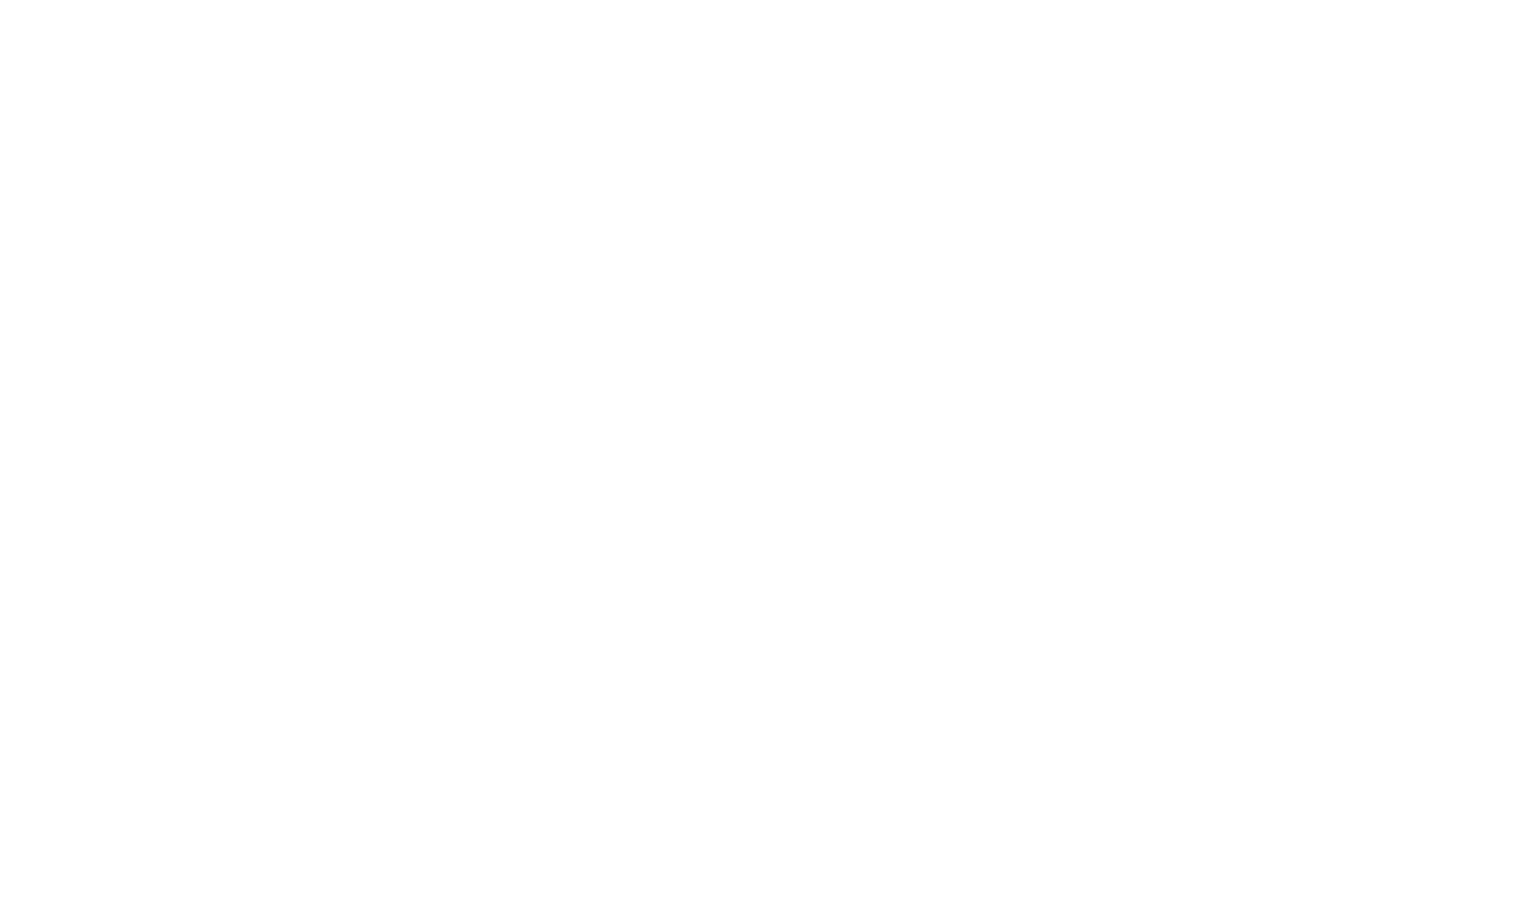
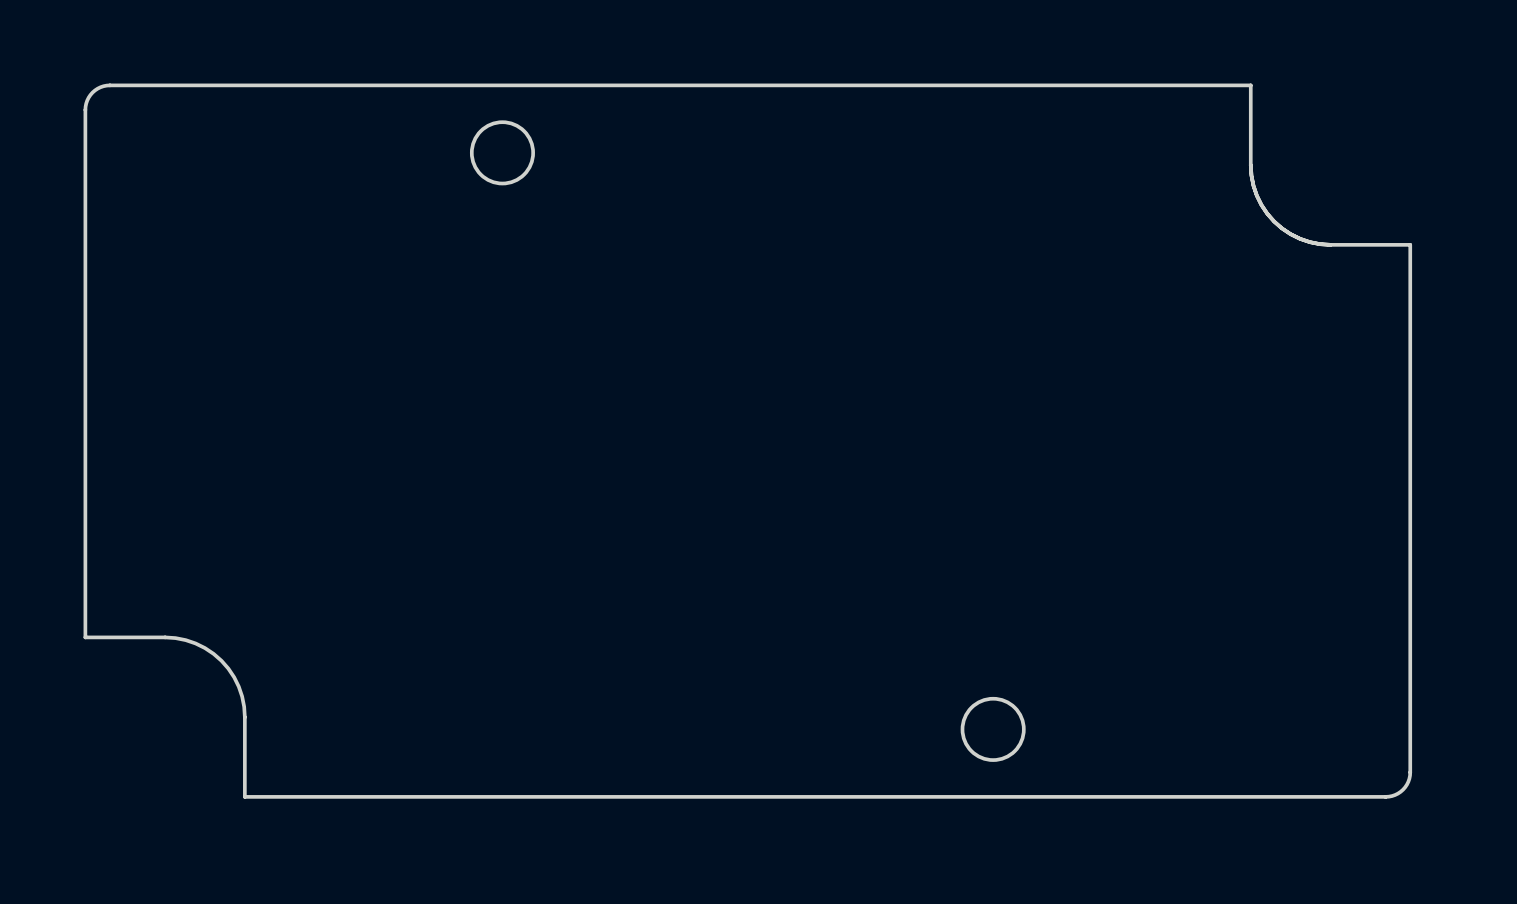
round board edge: none -> [469, 120, 535, 186]
board edge: none -> (1250, 165) (1250, 85) (109, 85) (100, 87) (88, 97) (85, 109) (85, 637) (175, 638) (195, 643) (221, 660) (234, 677) (244, 706) (244, 796) (1392, 796) (1405, 787) (1410, 772) (1410, 244) (1330, 244)
board edge: none -> (1250, 165) (1256, 195) (1274, 221) (1299, 238) (1330, 244)
board edge: none -> (1250, 165) (1256, 195) (1274, 221) (1299, 238) (1330, 244)
round board edge: none -> [960, 696, 1026, 762]

